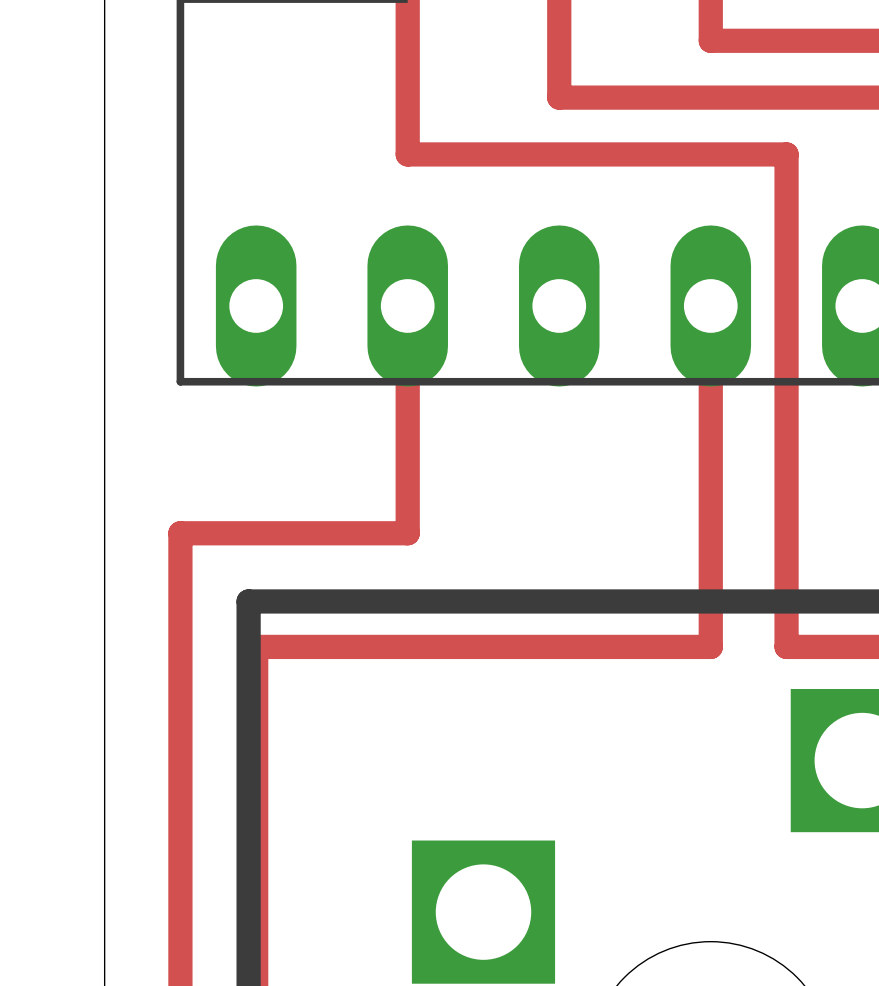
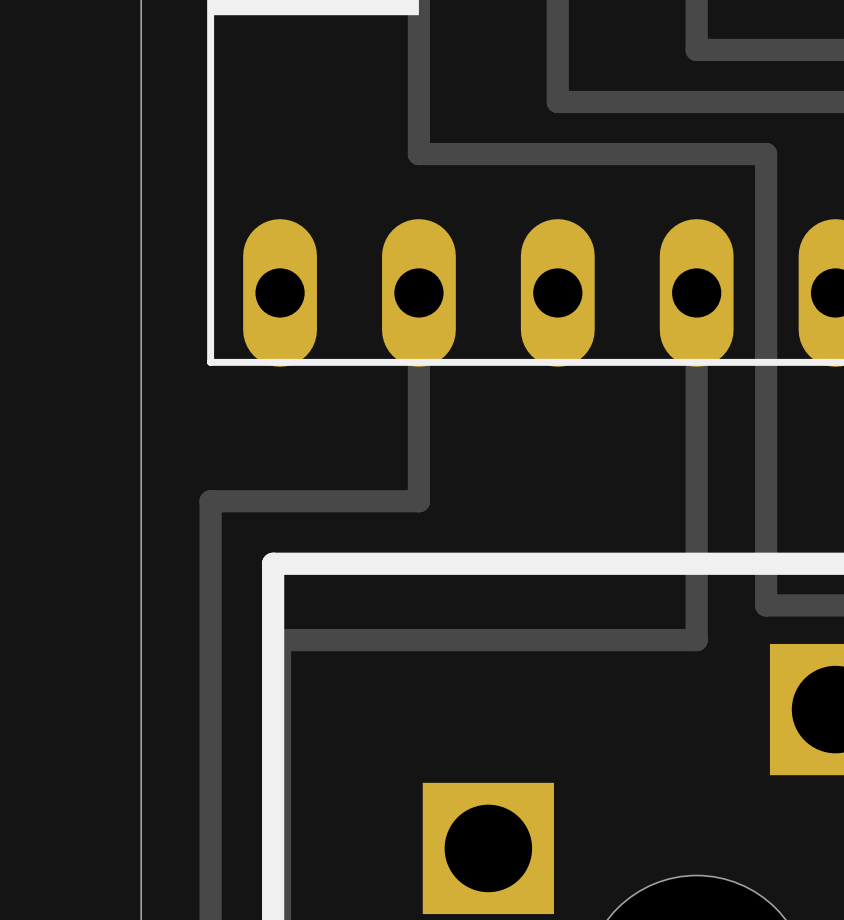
track: (710, 646) (256, 646) (256, 684) -> (696, 605) (696, 640) (280, 640)

